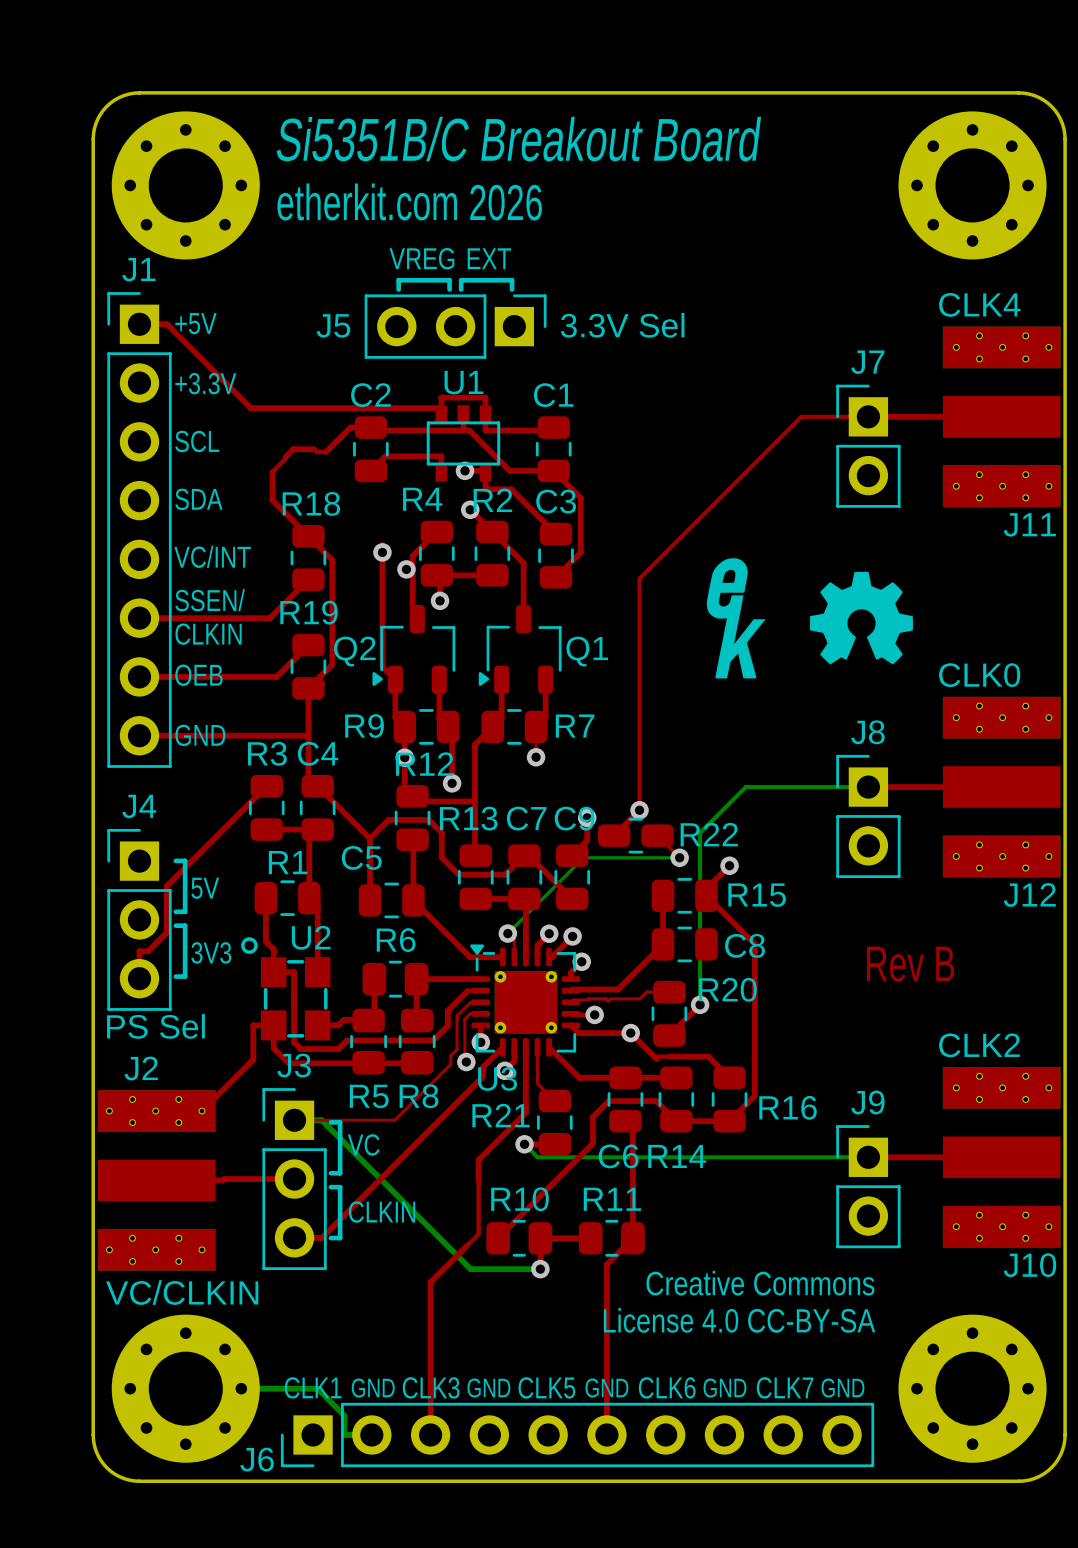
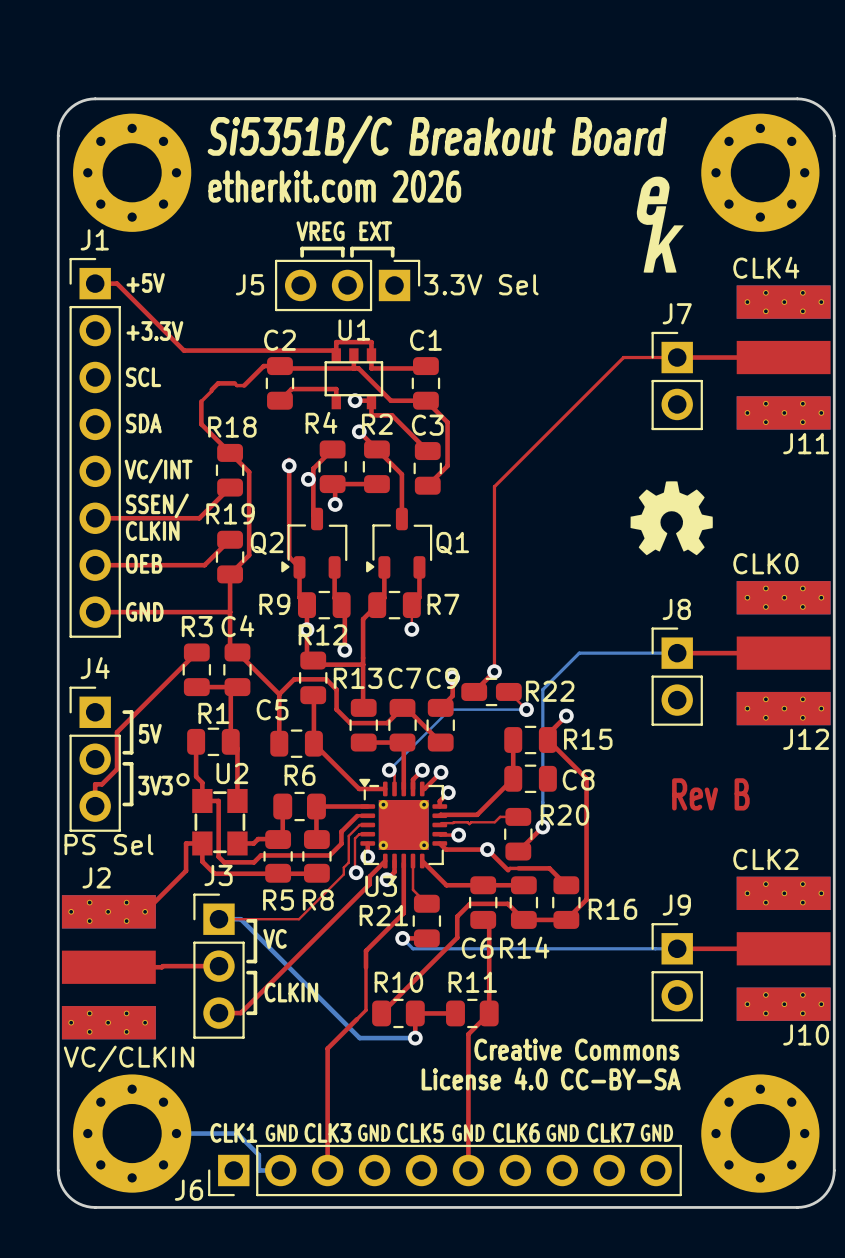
drawing position: (736, 618) -> (660, 224)

